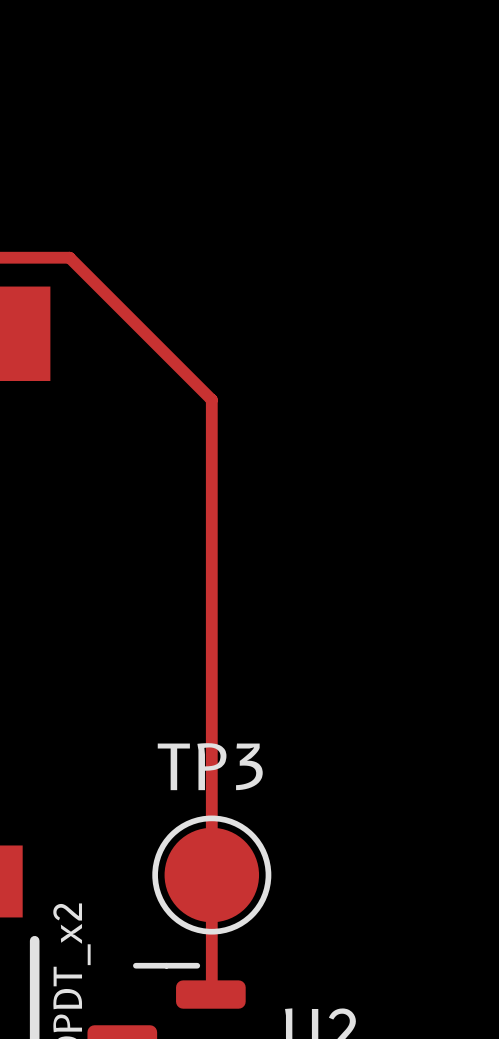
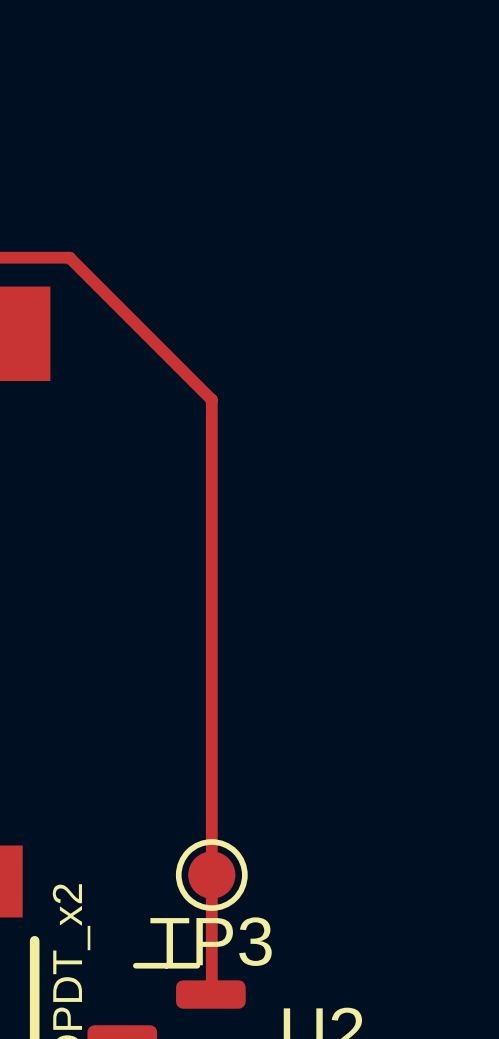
TP3 name position: TP3 (210, 766) -> TP3 (211, 941)
TP3 footprint: [152, 815, 272, 935] -> [175, 839, 248, 911]

